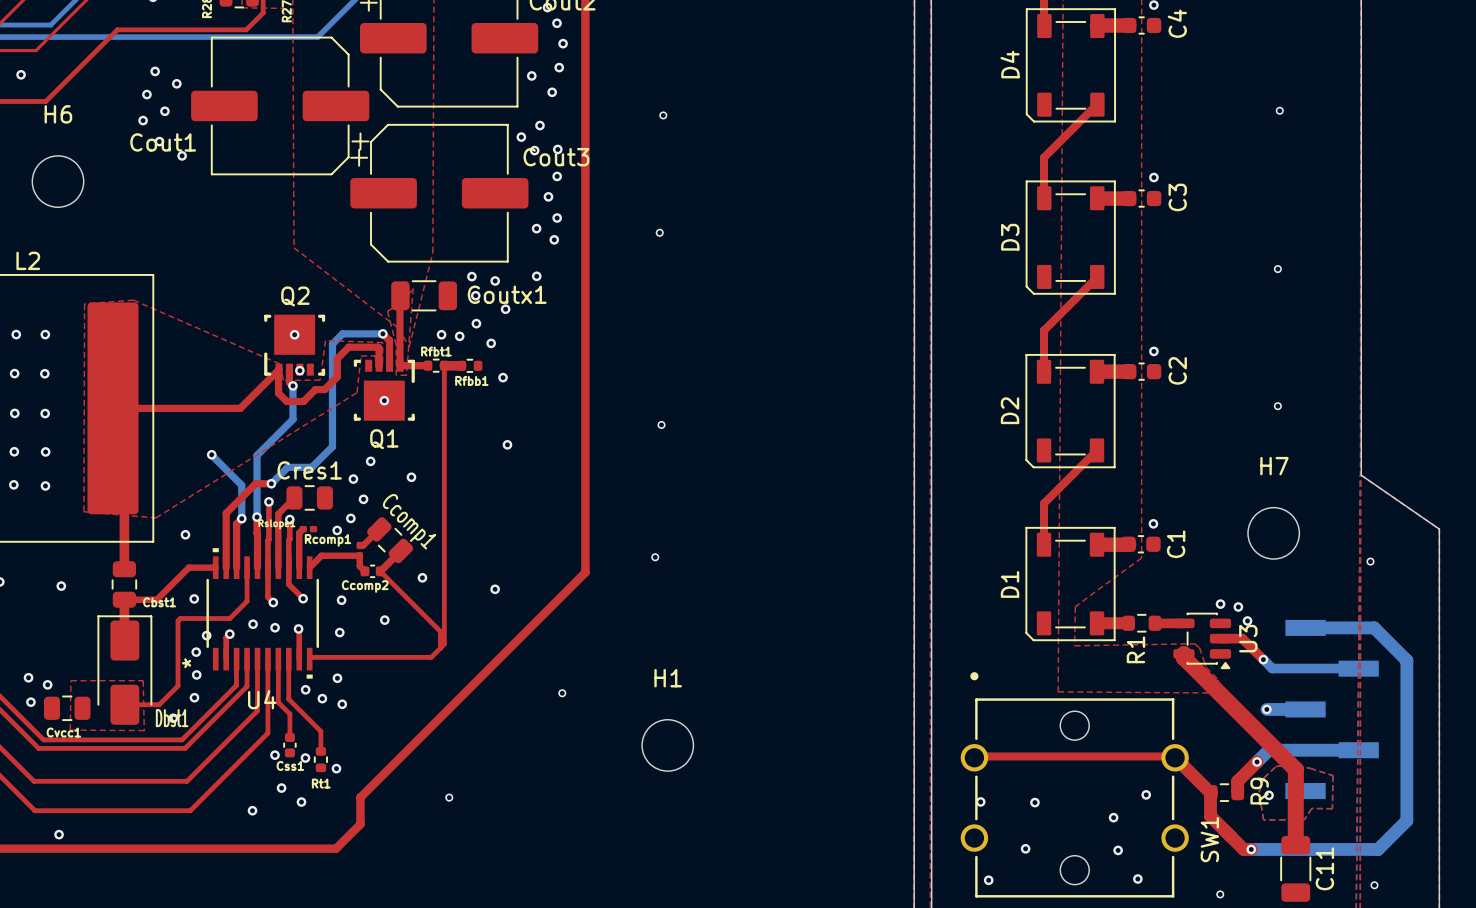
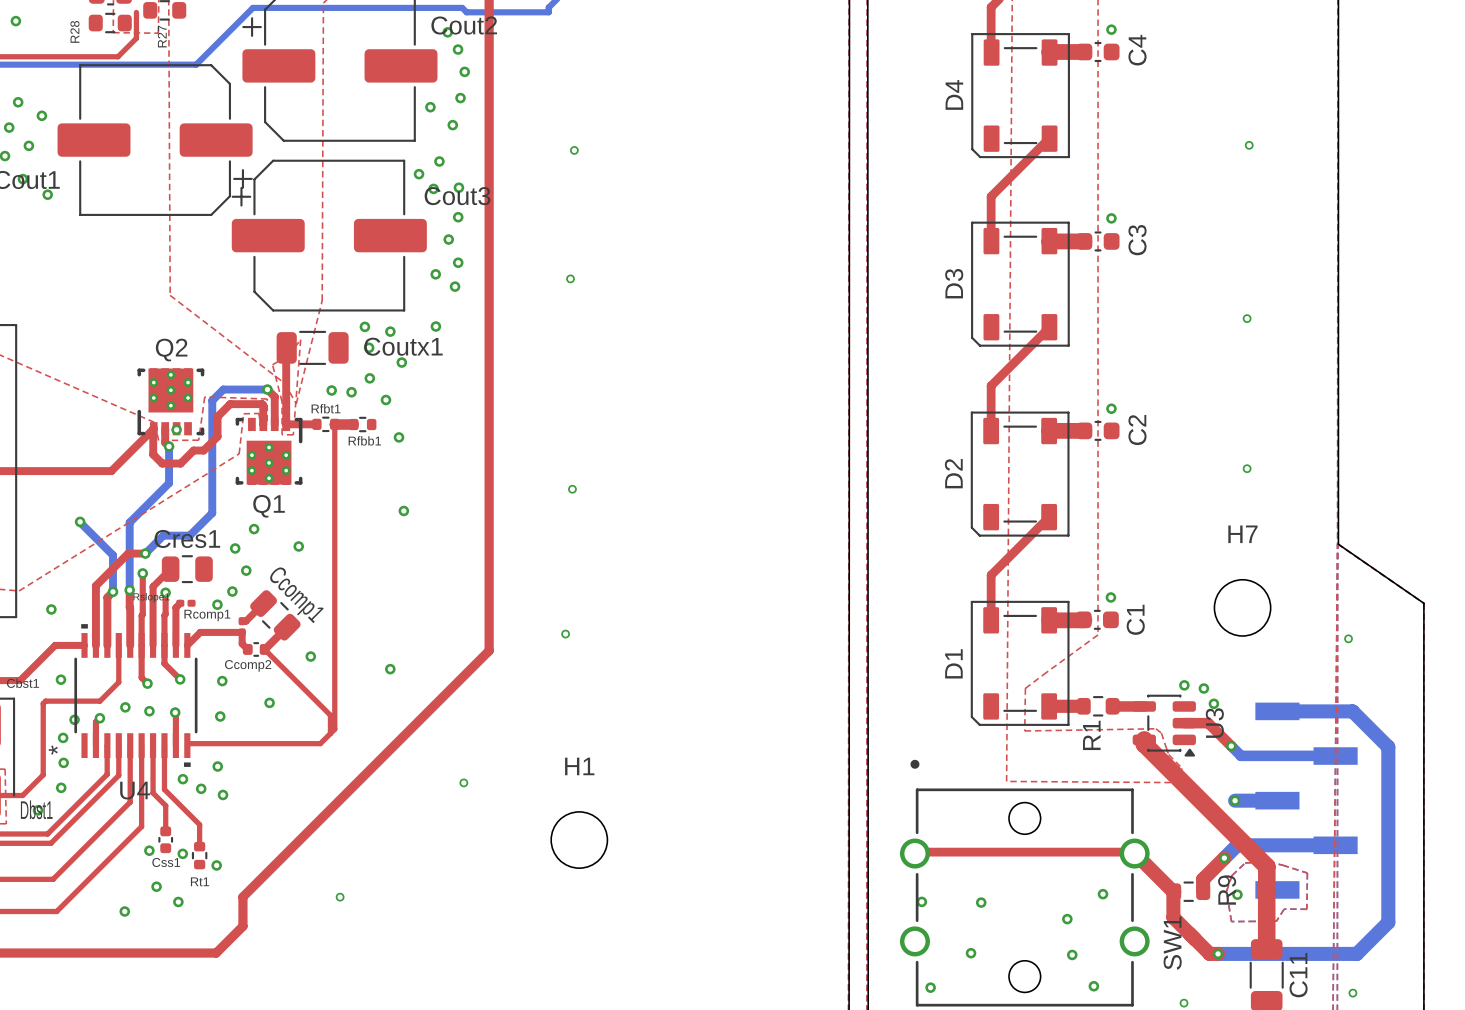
Q2 footprint: [264, 314, 326, 376] -> [137, 368, 205, 436]
via: (294, 334) -> none
Q1 footprint: [353, 359, 415, 421] -> [235, 417, 303, 485]
via: (384, 400) -> none

